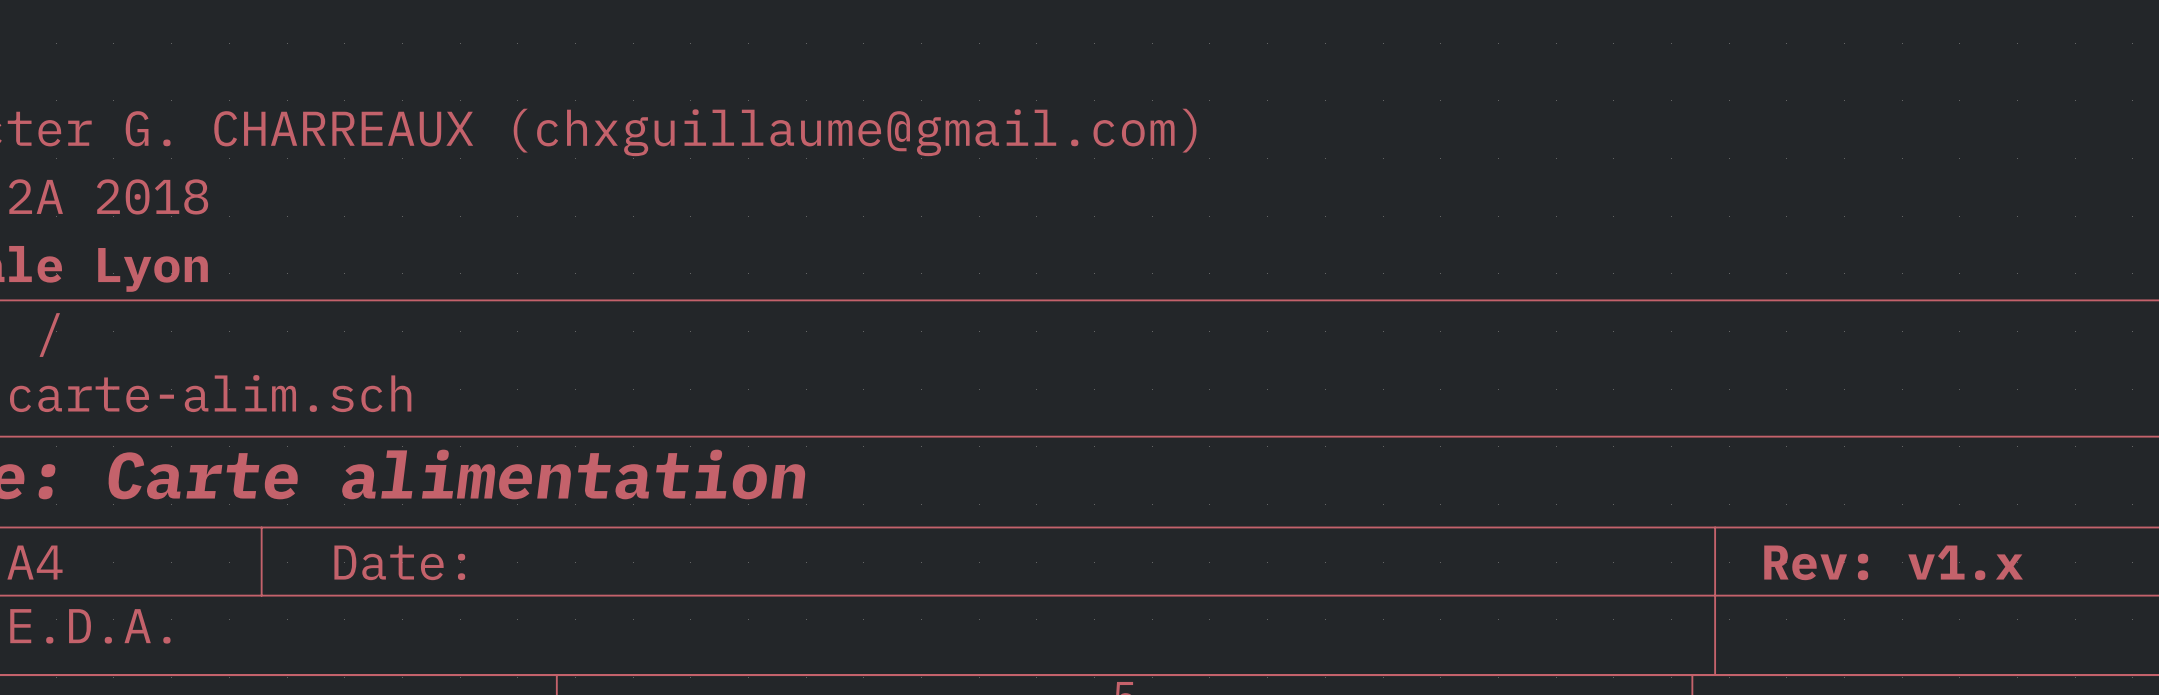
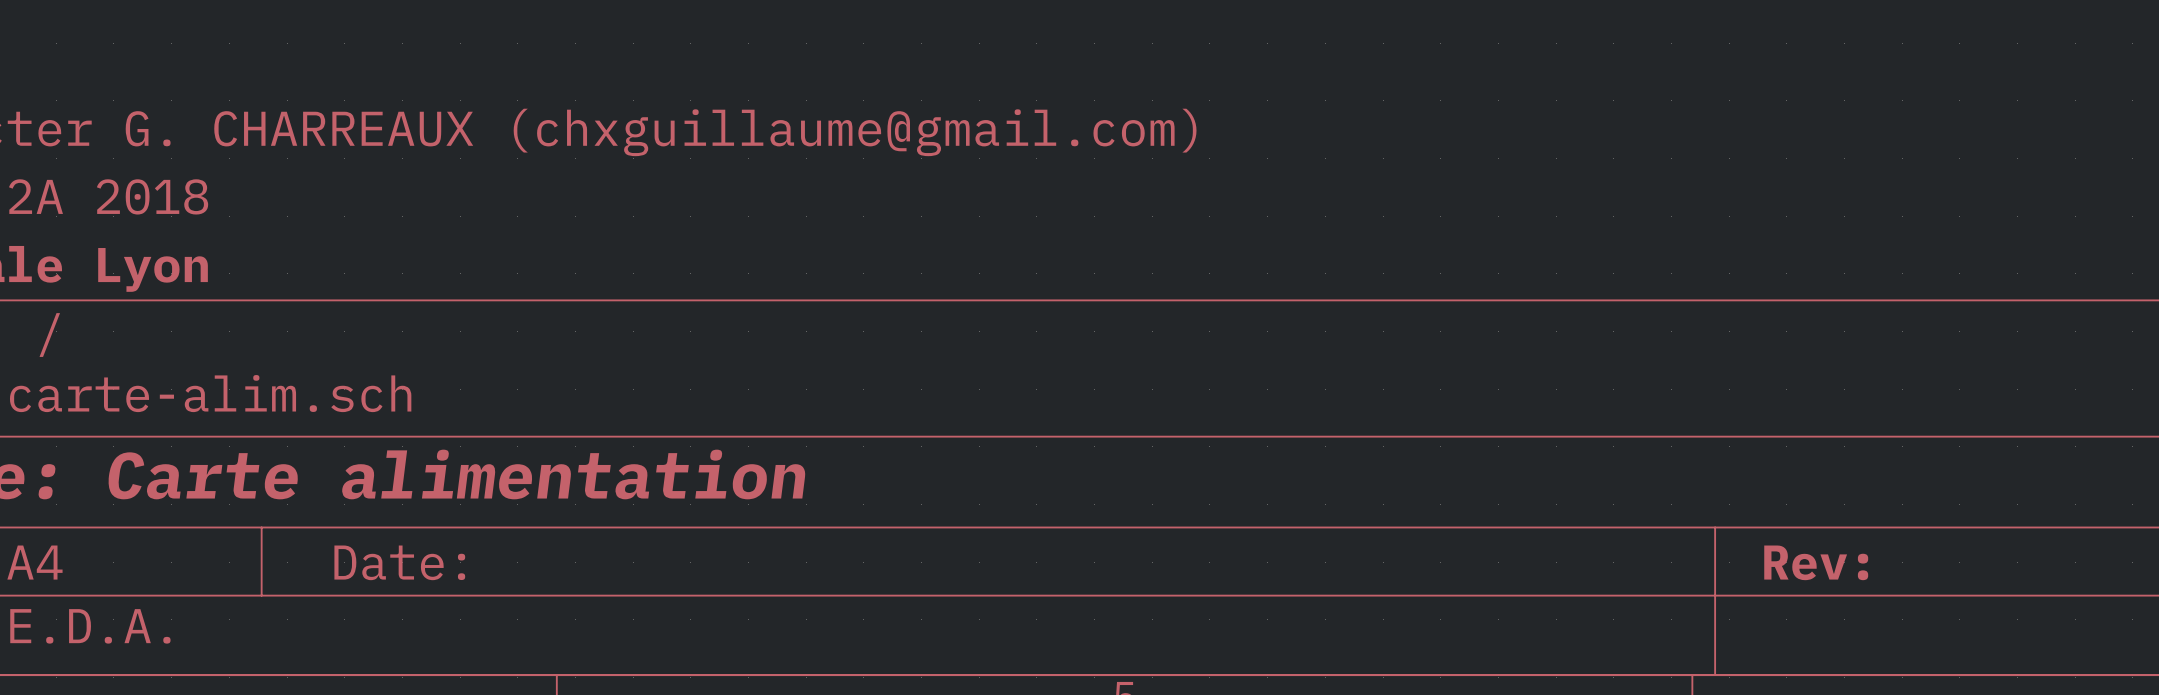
title block: Rev: v1.x (1893, 562) -> Rev: (1816, 562)

